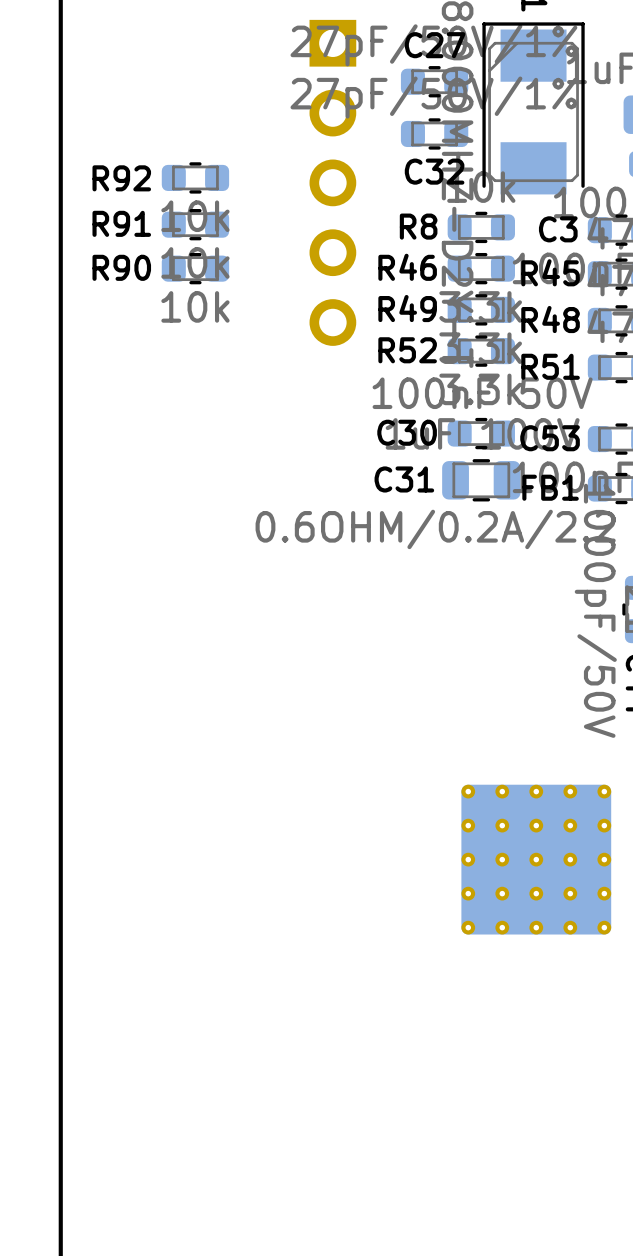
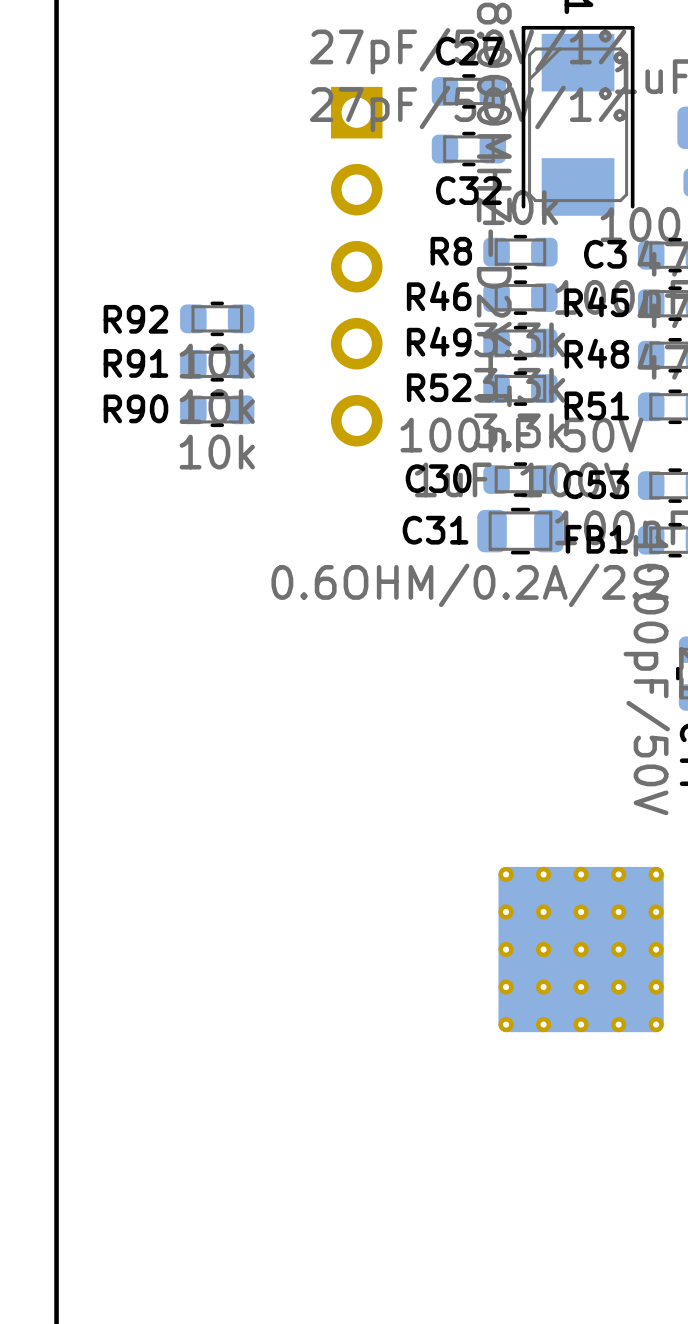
R92 position: (195, 177) -> (217, 318)
part position: (332, 182) -> (356, 266)
R91 position: (195, 224) -> (217, 364)
R90 position: (195, 268) -> (217, 409)

